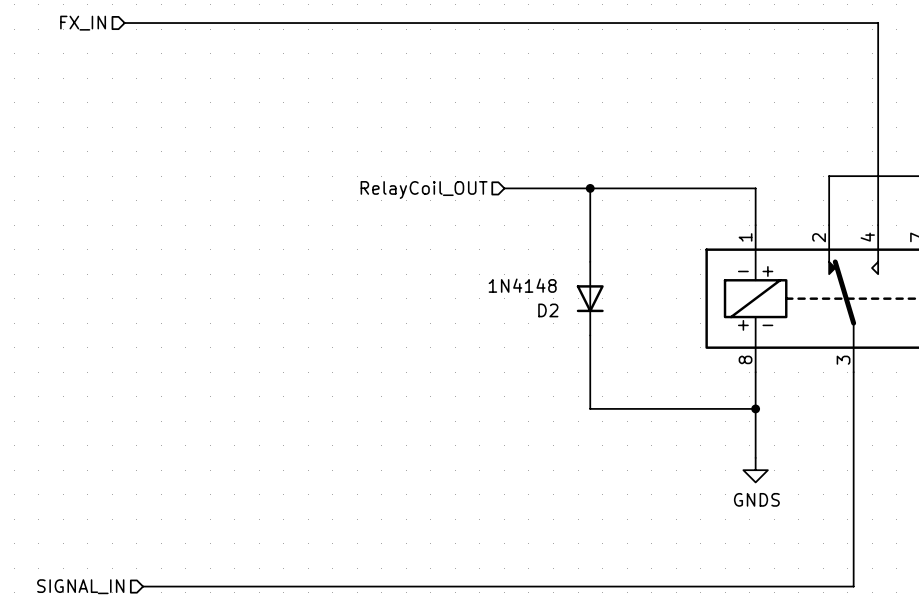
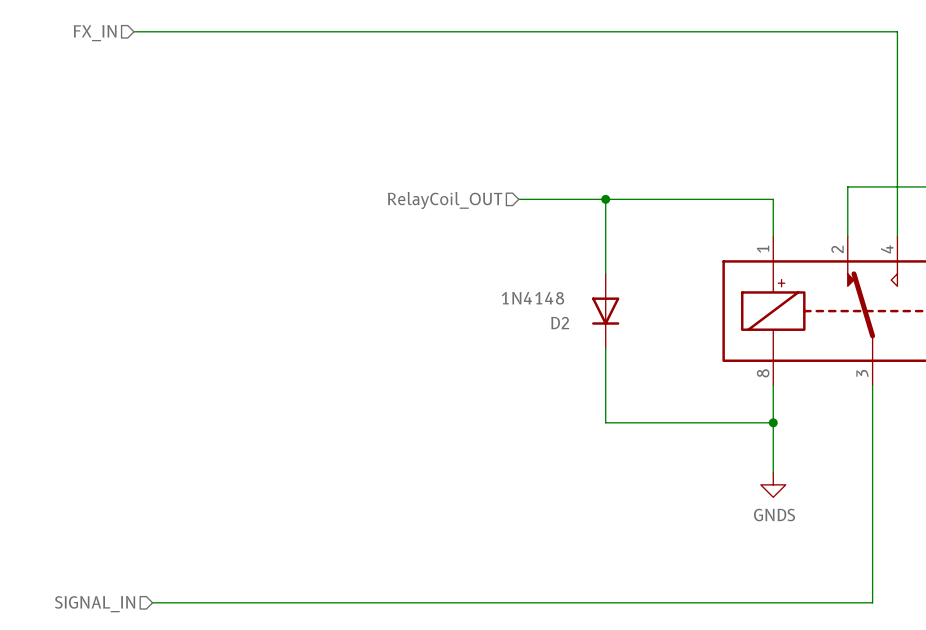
part text: - + (755, 271) -> none
part text: none -> + (781, 283)
part text: + - (755, 325) -> none

